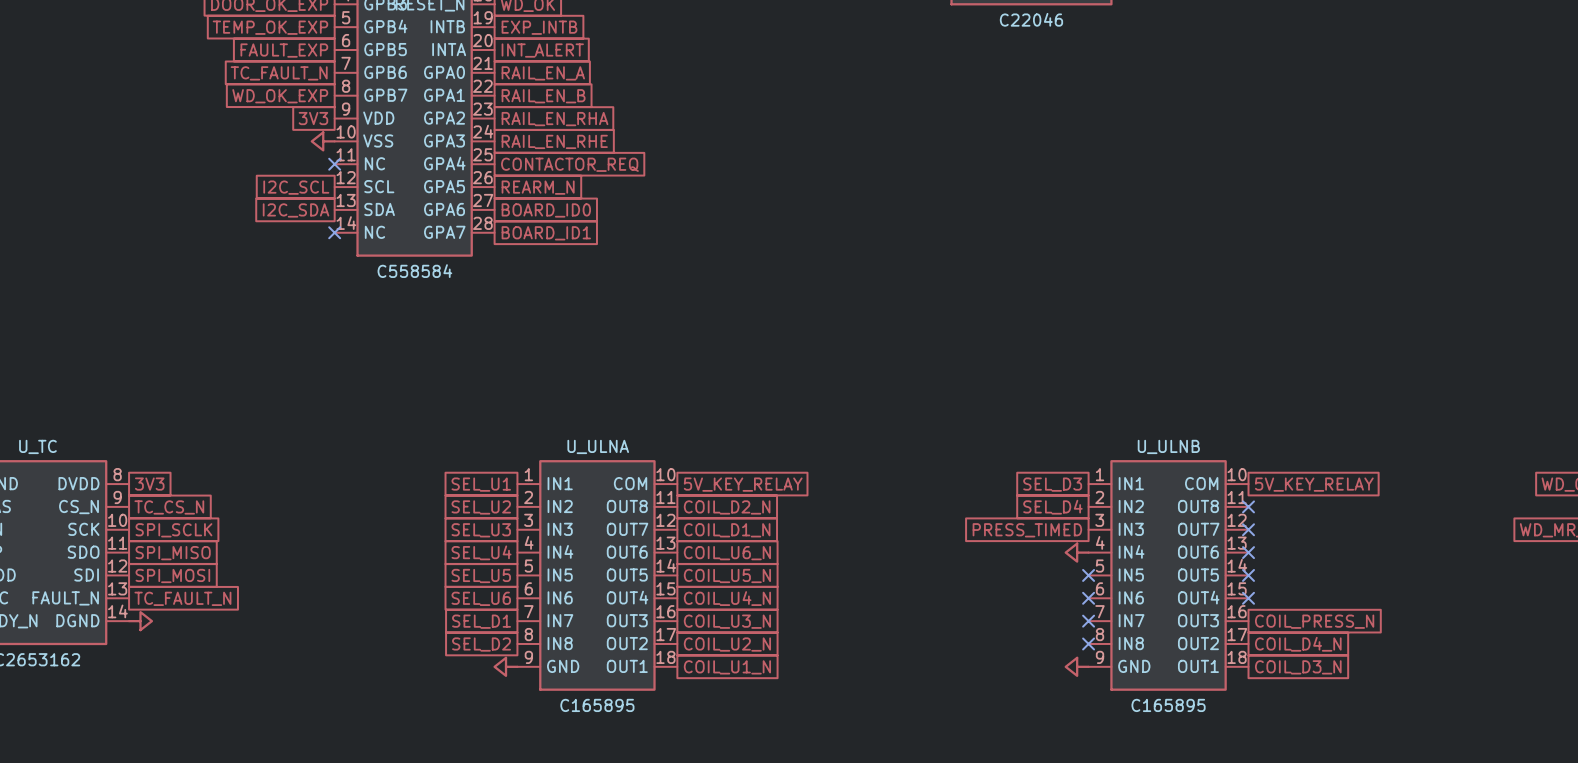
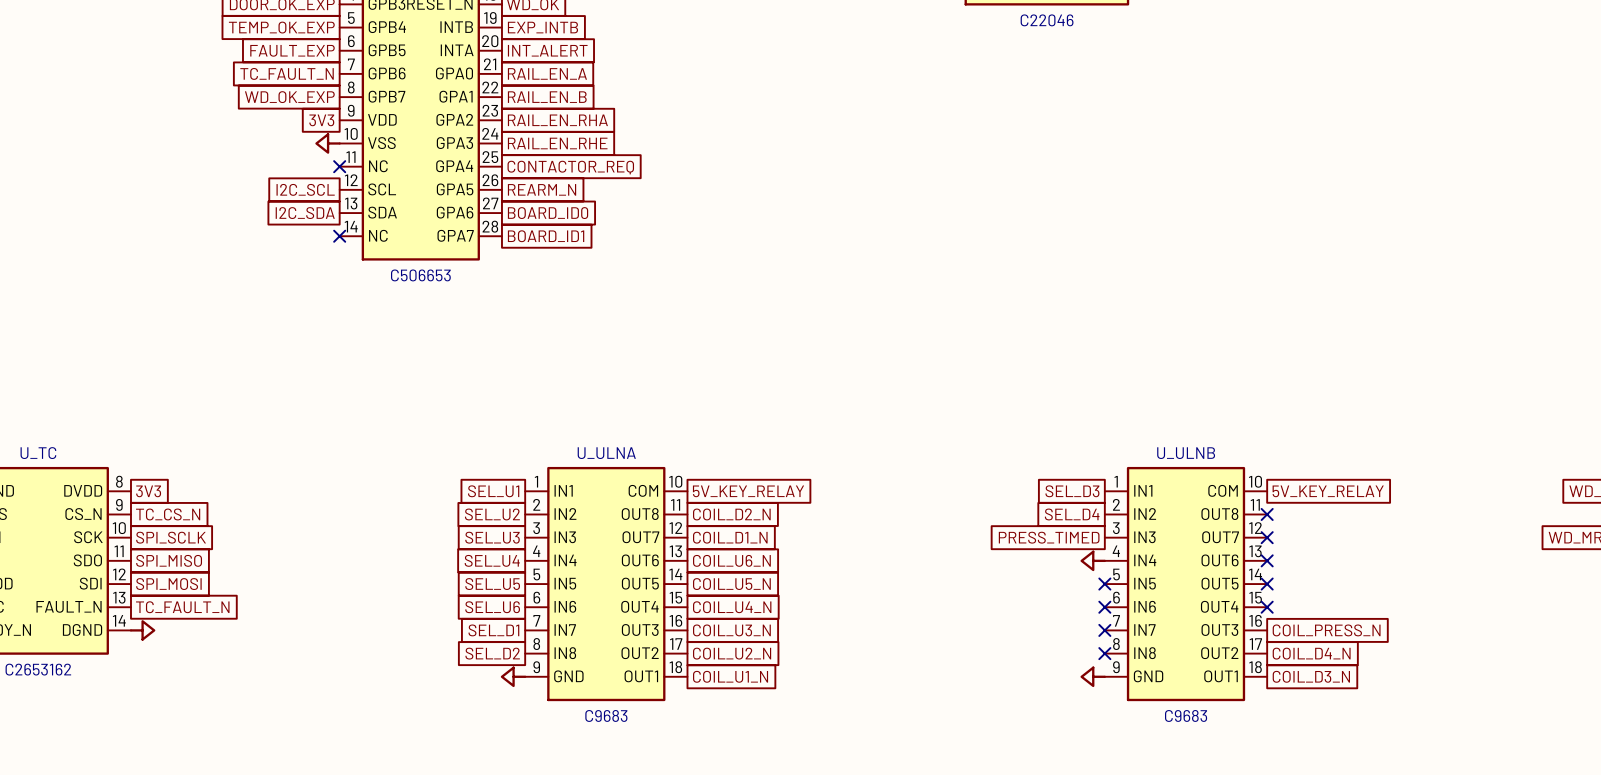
part value: C558584 (414, 271) -> C506653 (420, 275)
U_ULNA value: C165895 (597, 705) -> C9683 (606, 715)
U_ULNB value: C165895 (1168, 705) -> C9683 (1186, 715)

